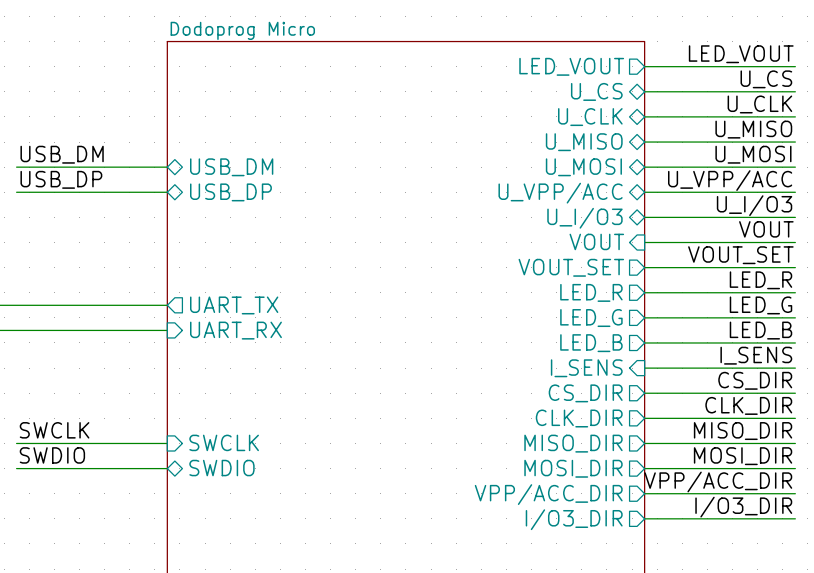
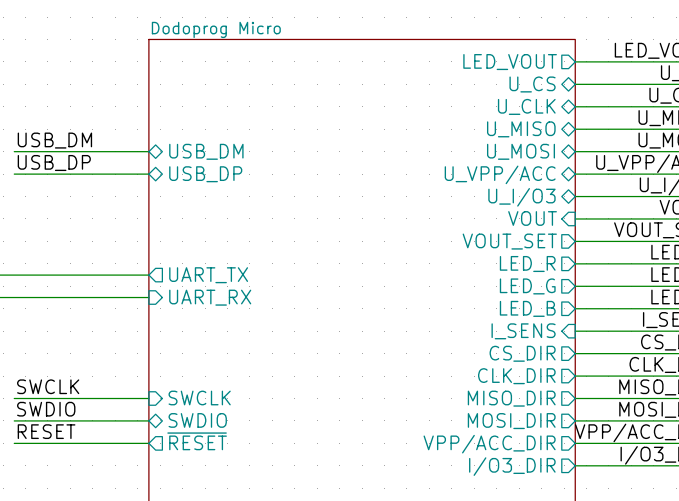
label: none -> RESET (46, 431)
sheet pin: none -> ~{RESET} (197, 441)
wire: none -> (14, 443) (148, 443)

